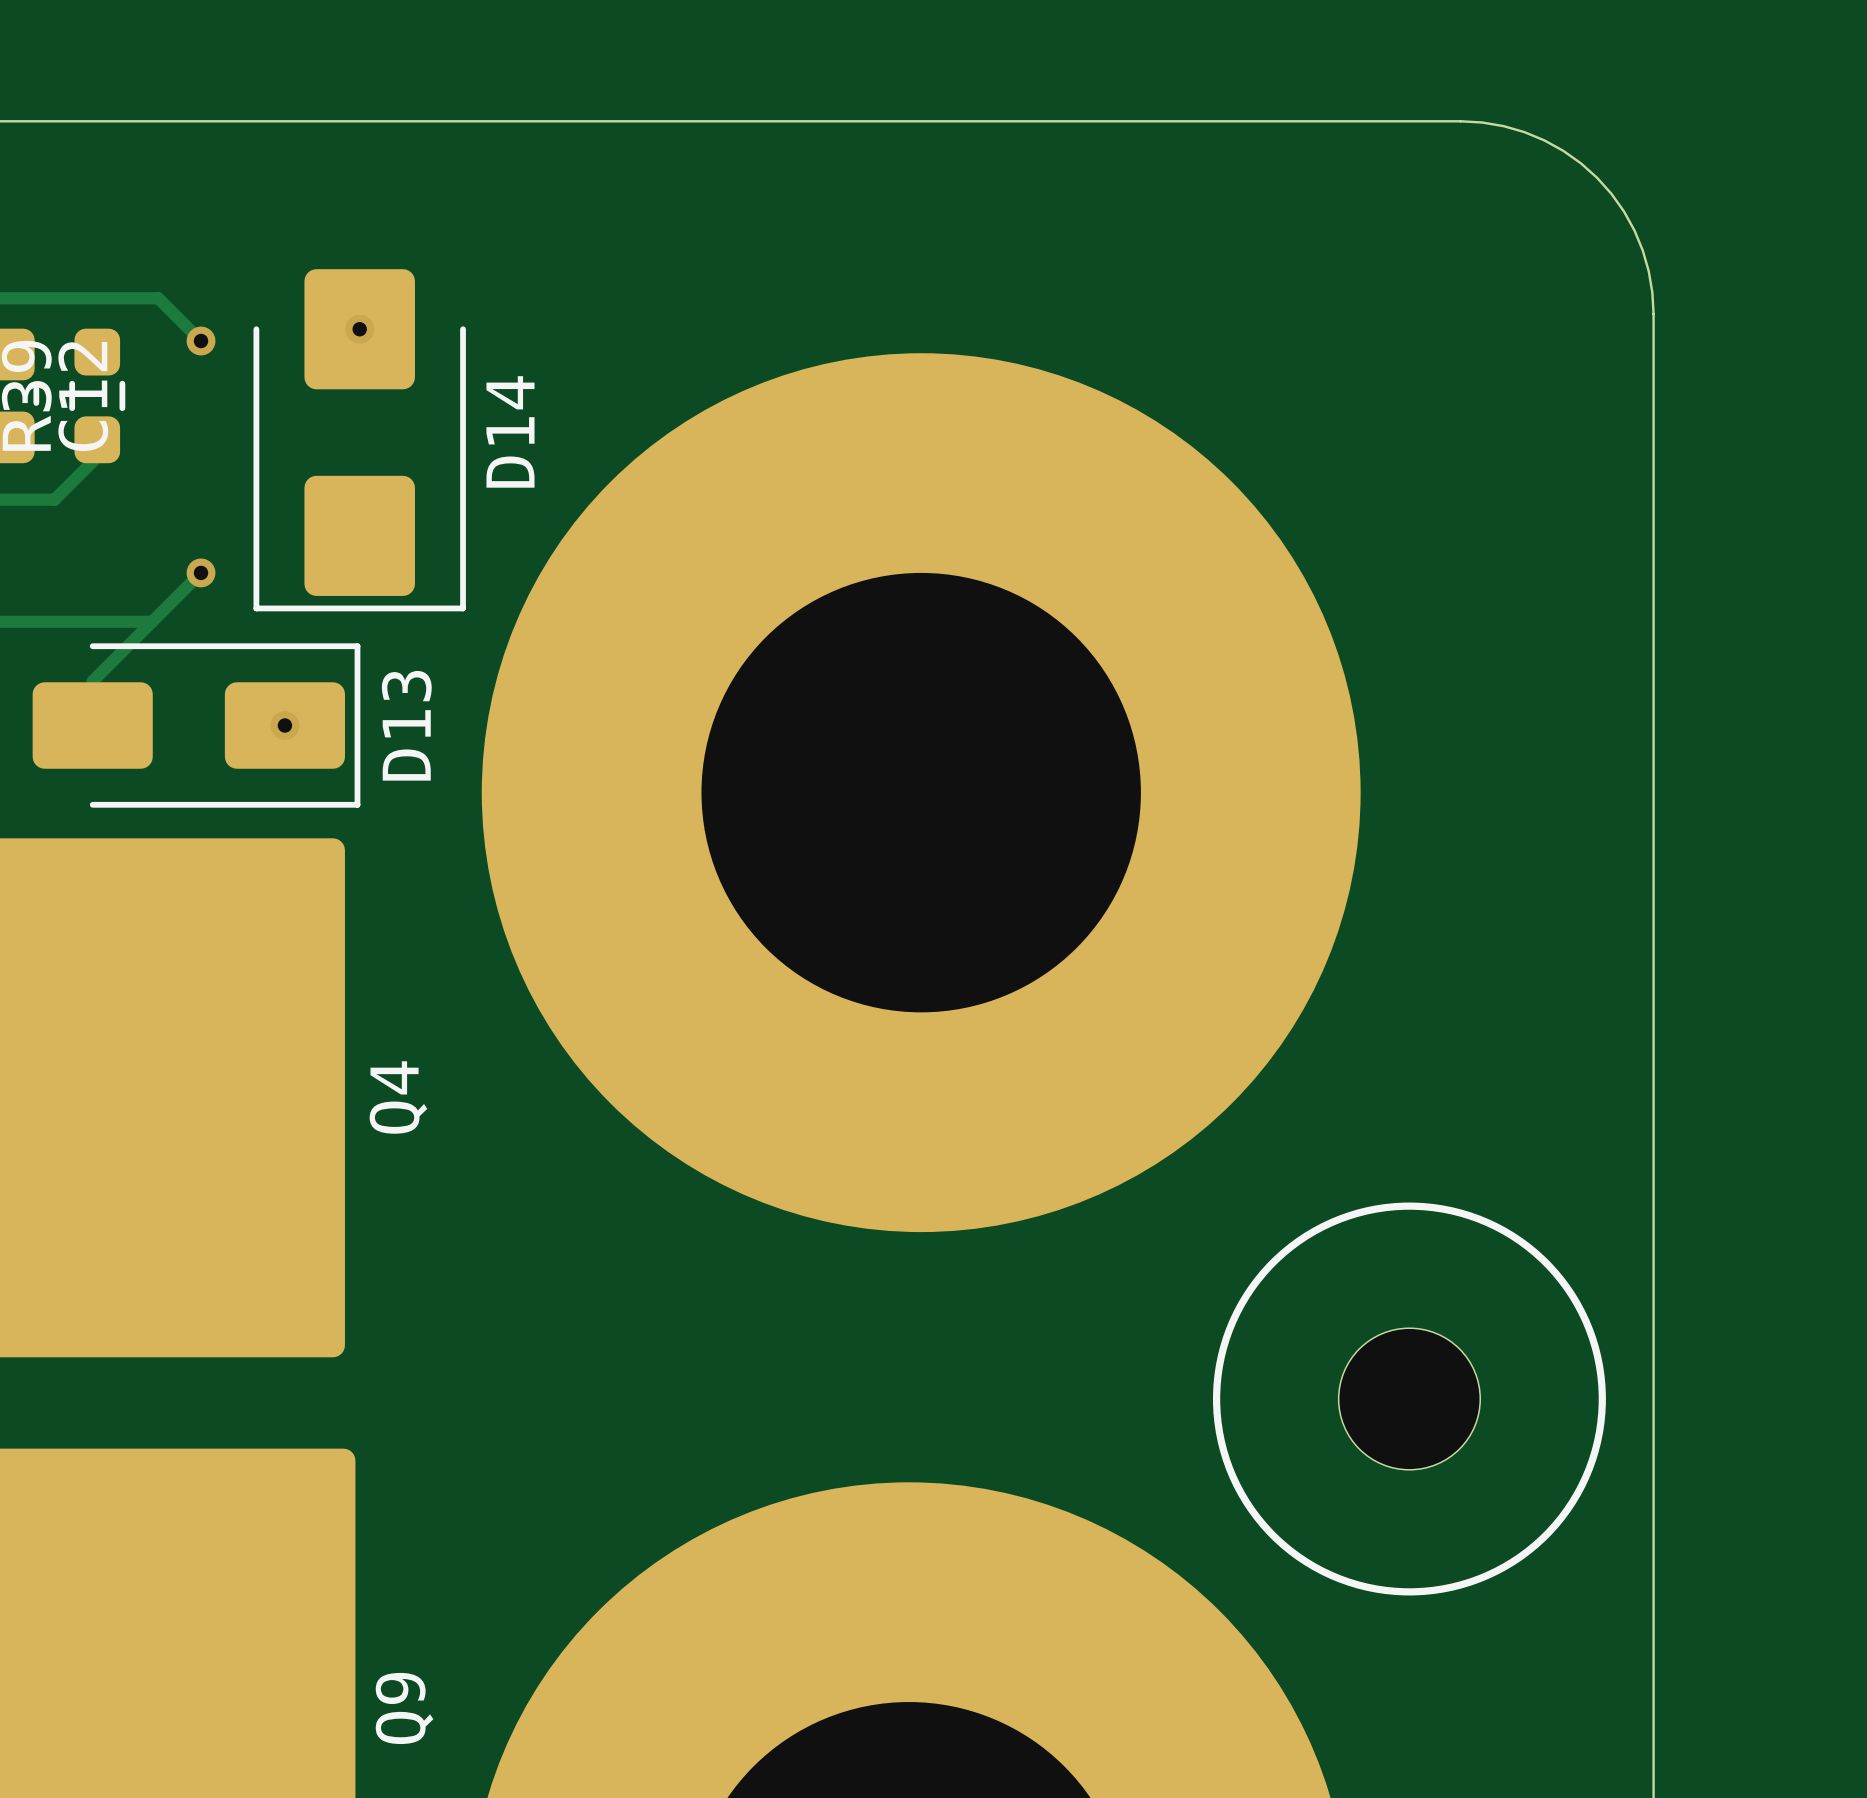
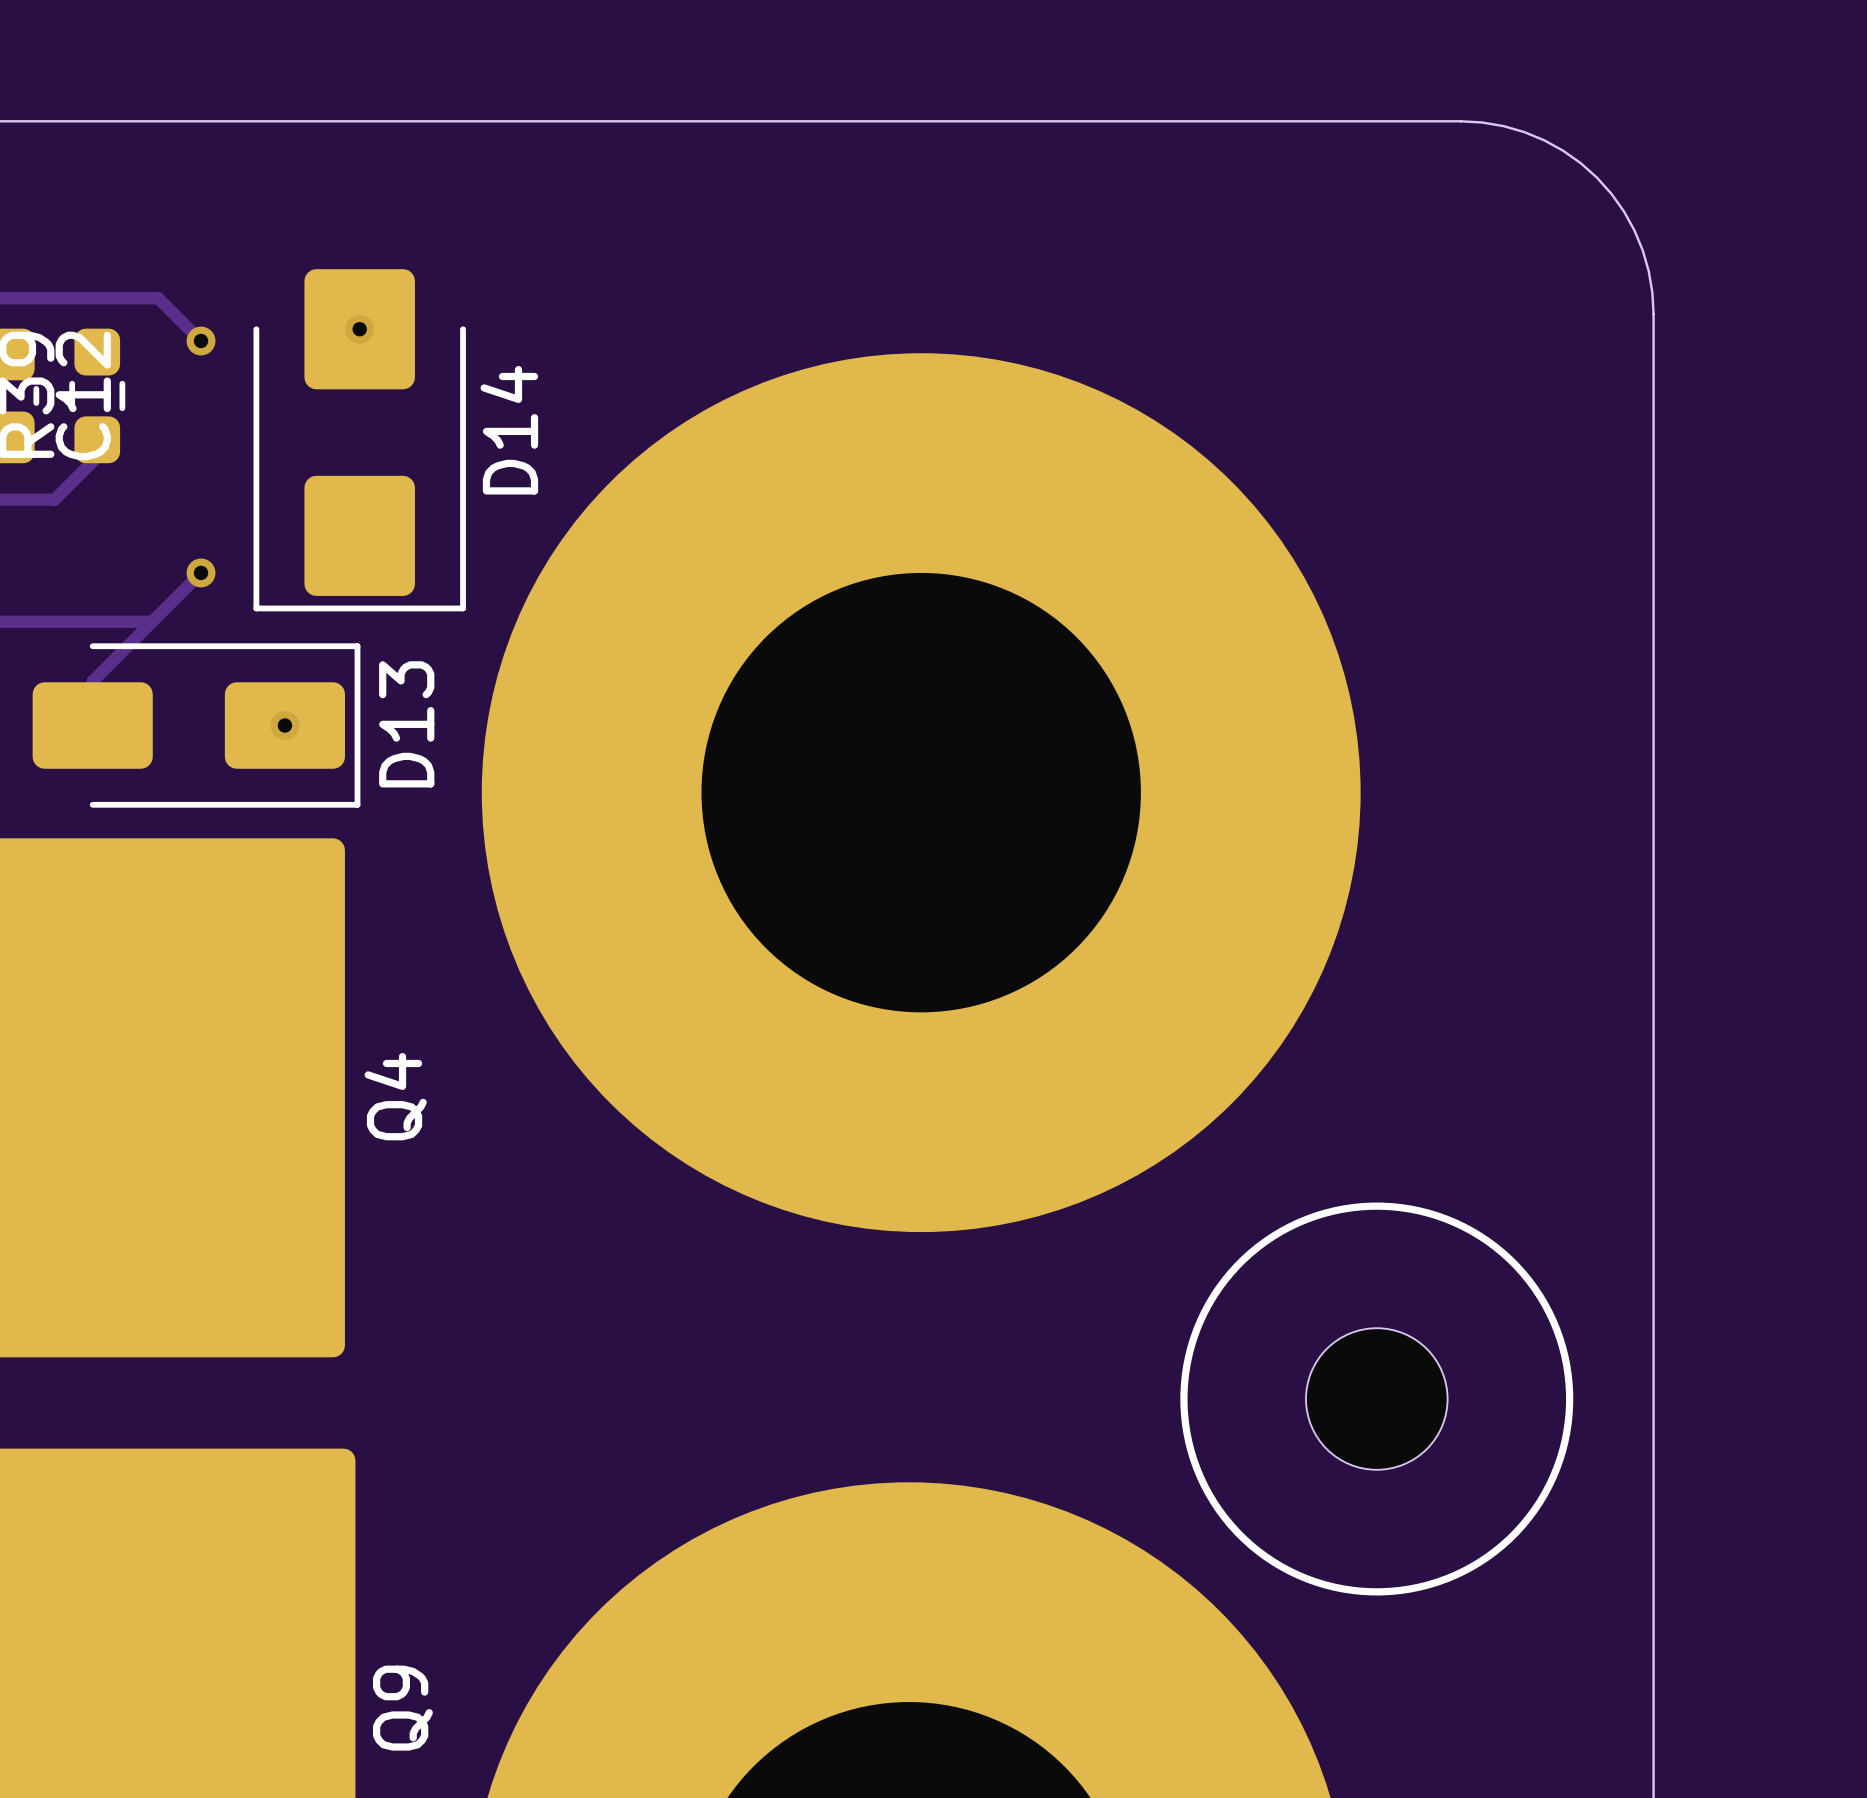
part position: (1409, 1399) -> (1376, 1399)

